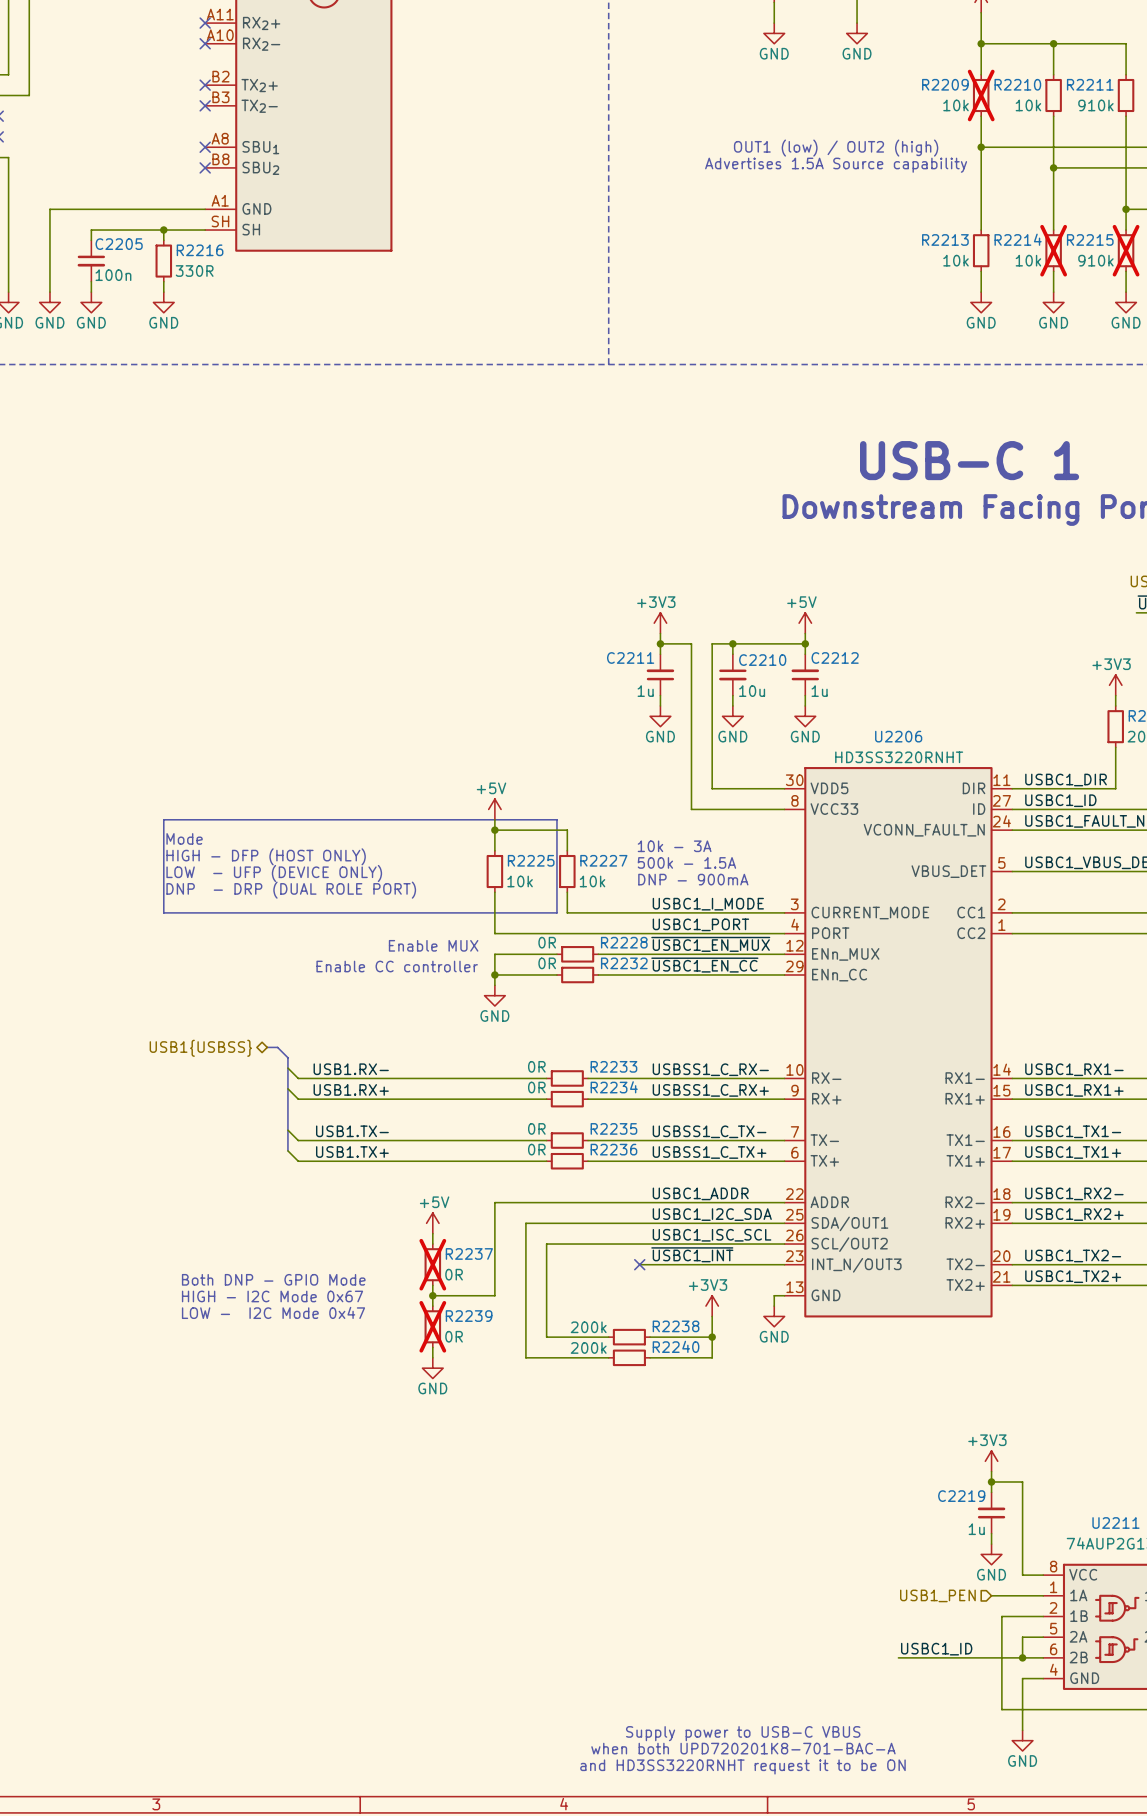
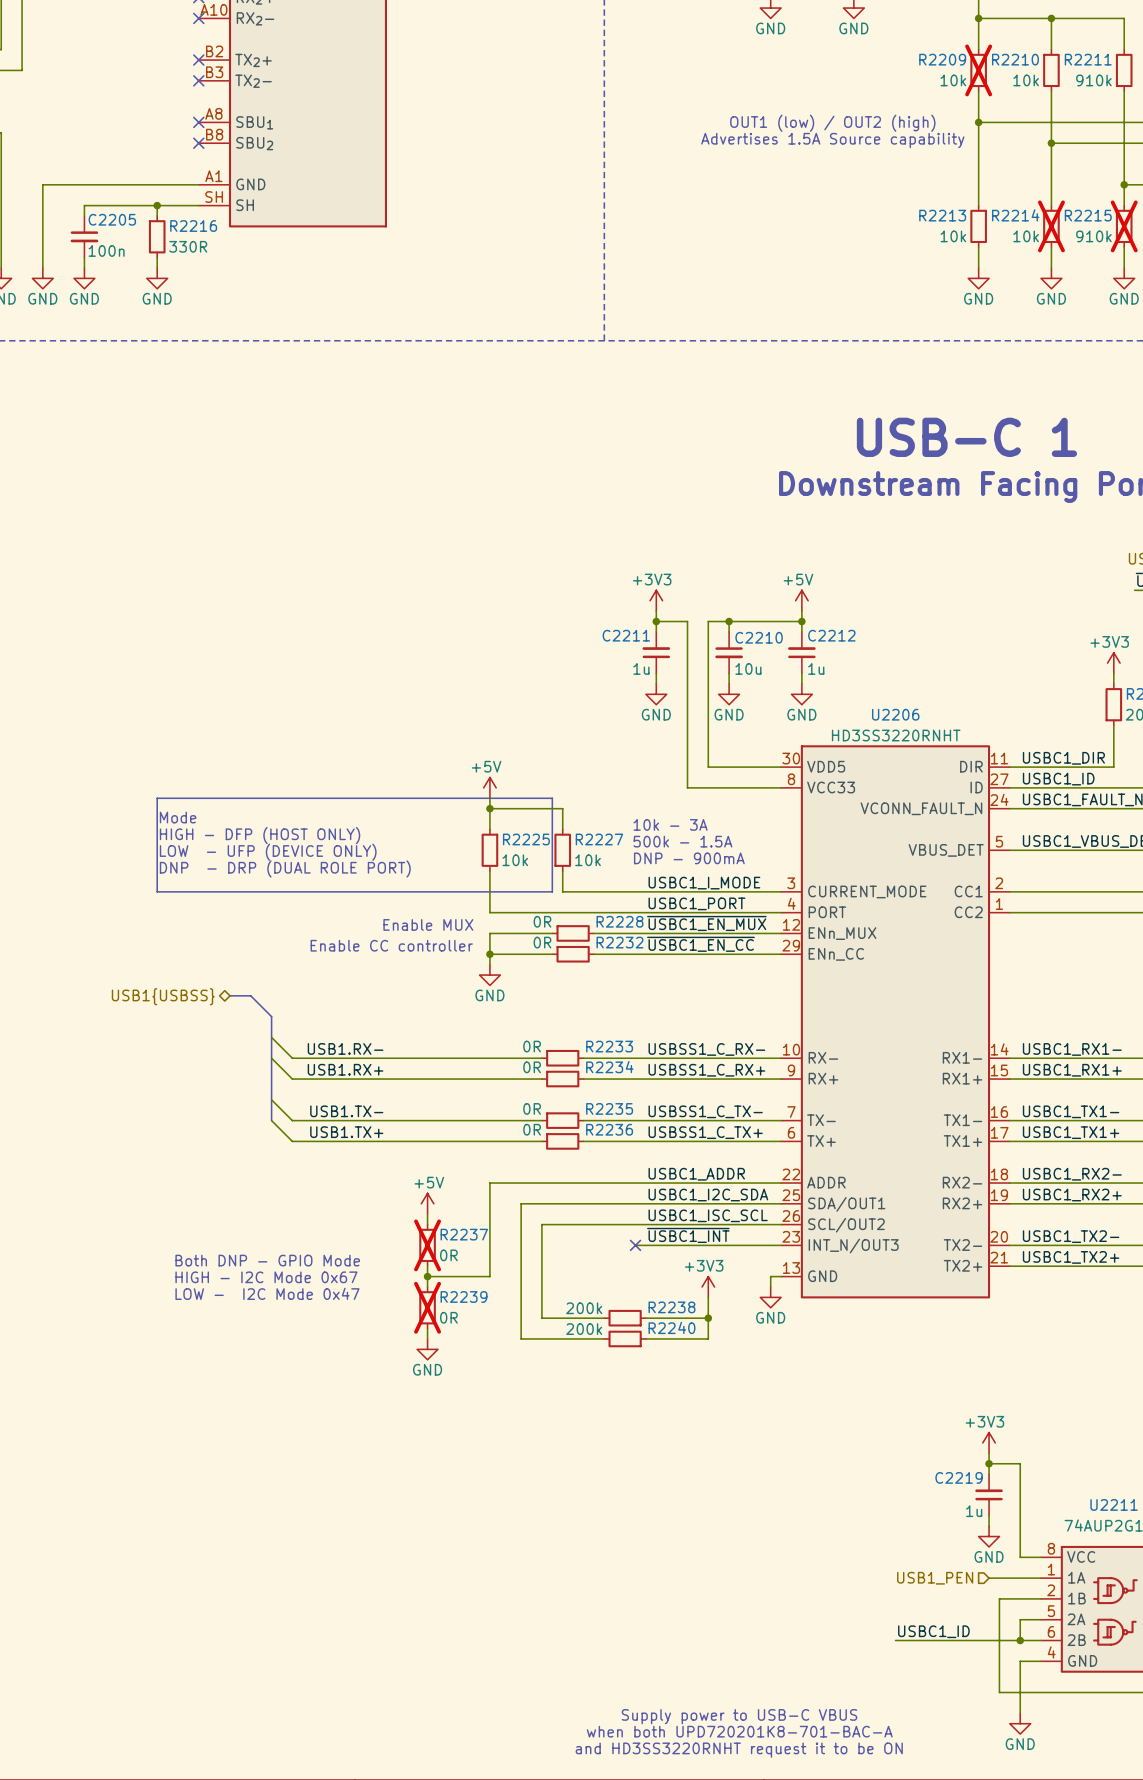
bus: none -> (229, 995) (250, 995) (271, 1016) (271, 1120)
bus: (267, 1047) (277, 1047) (287, 1057) (287, 1150) -> none
hierarchical label position: USB1{USBSS} (200, 1048) -> USB1{USBSS} (163, 996)
wire: none -> (271, 1037) (281, 1047)
wire: none -> (271, 1058) (281, 1068)
wire: none -> (271, 1099) (281, 1110)
wire: none -> (271, 1120) (281, 1131)

